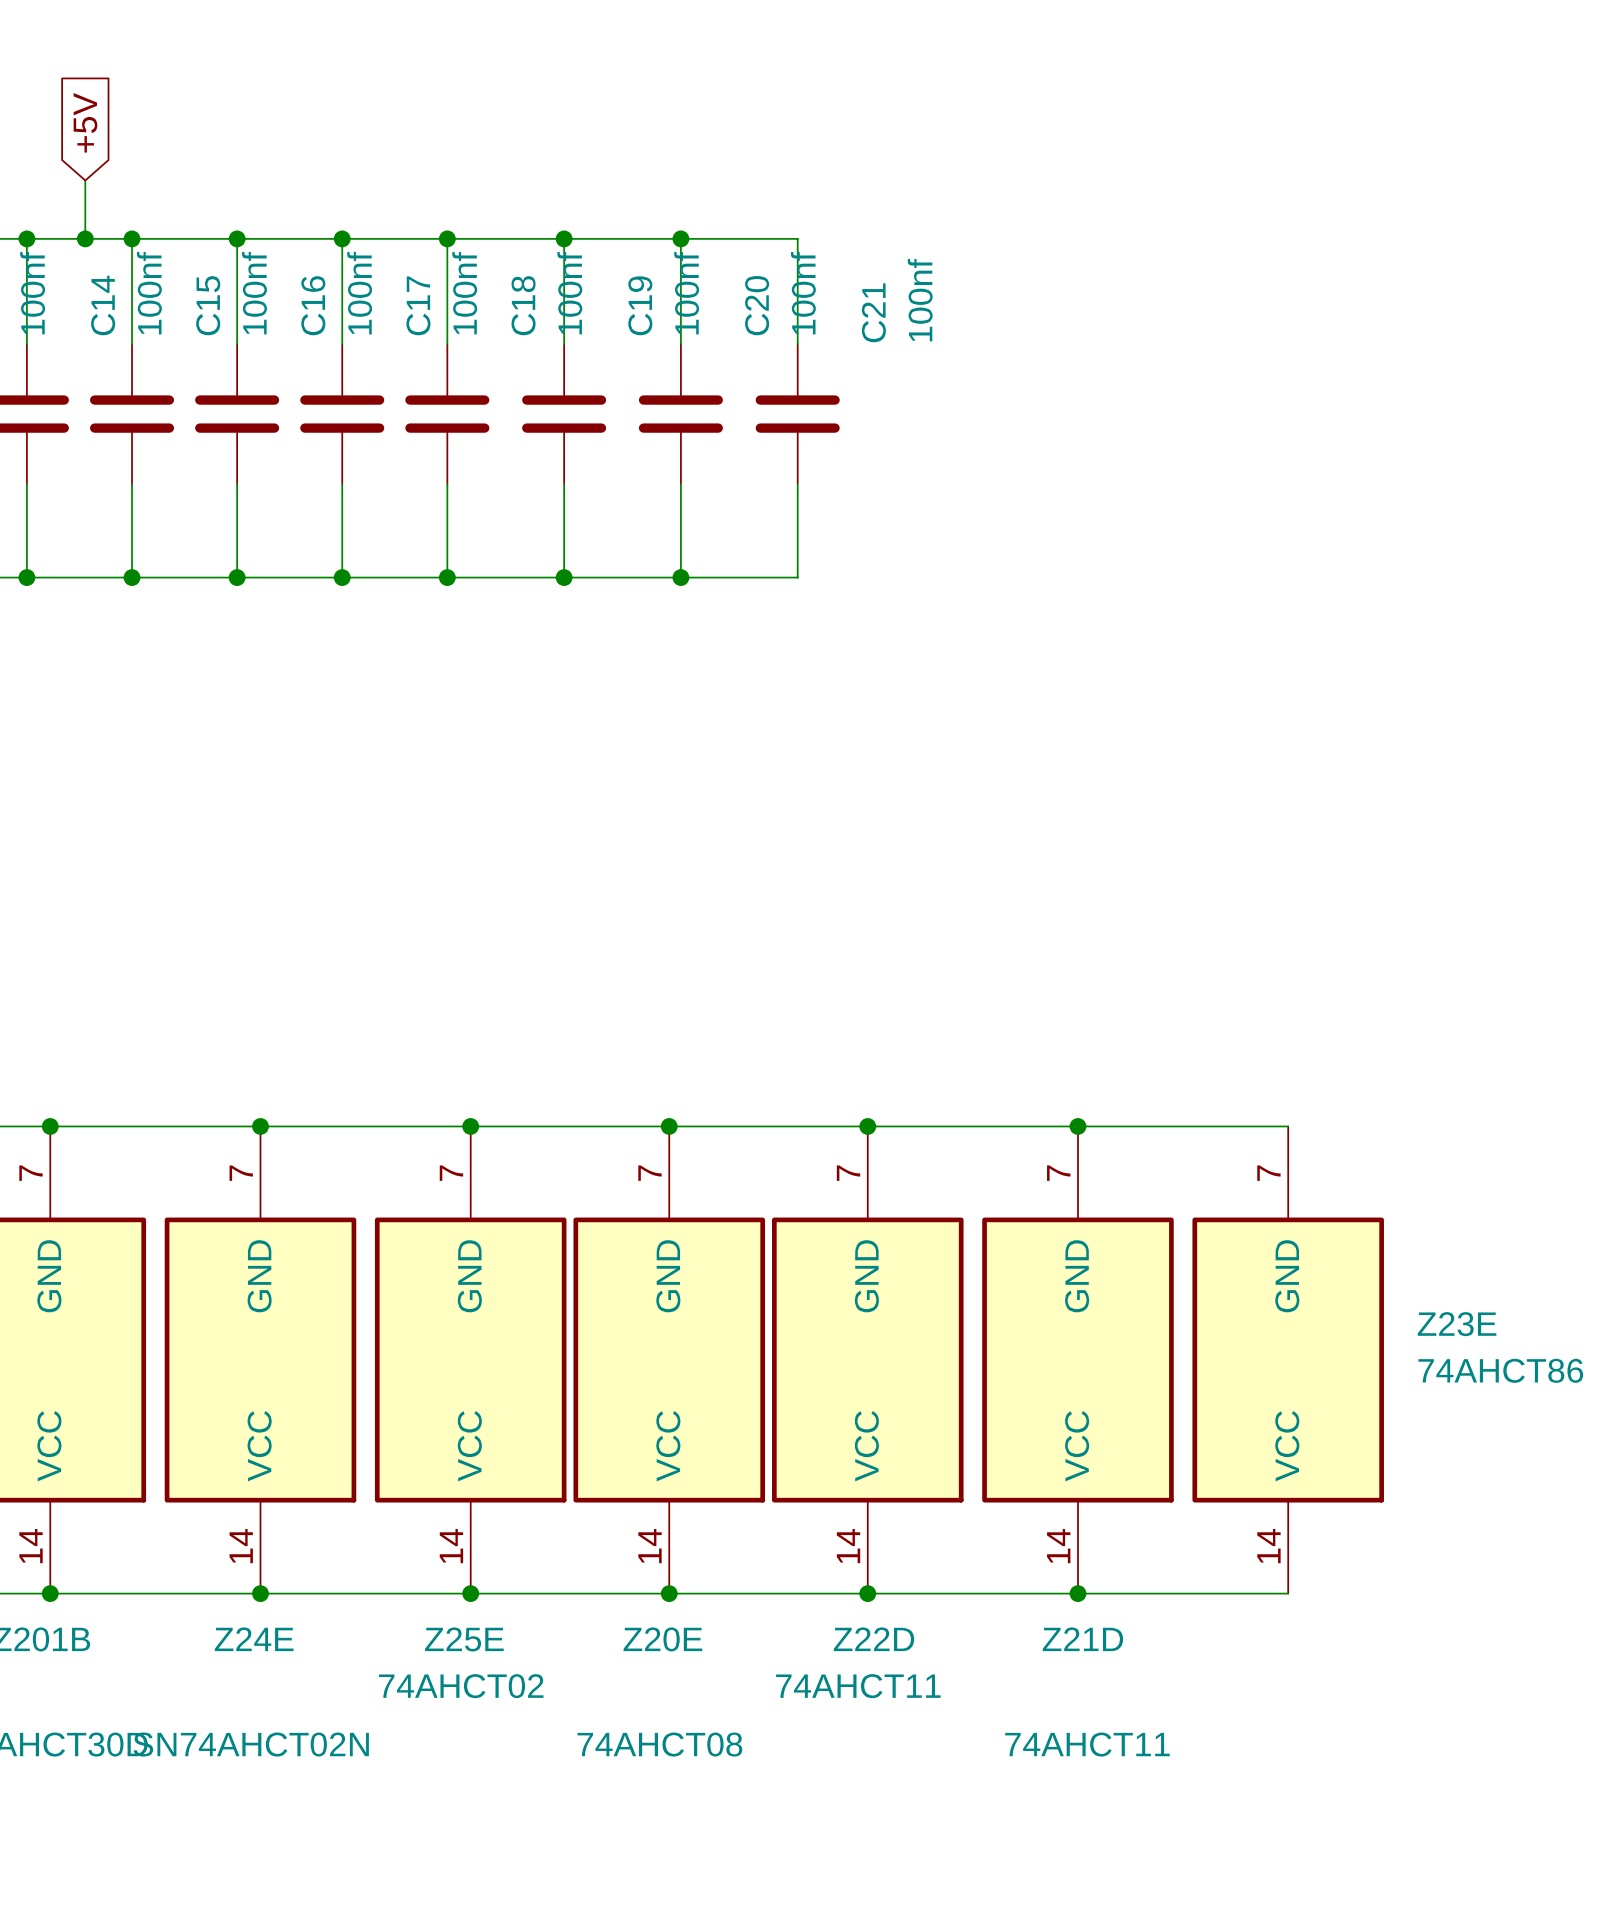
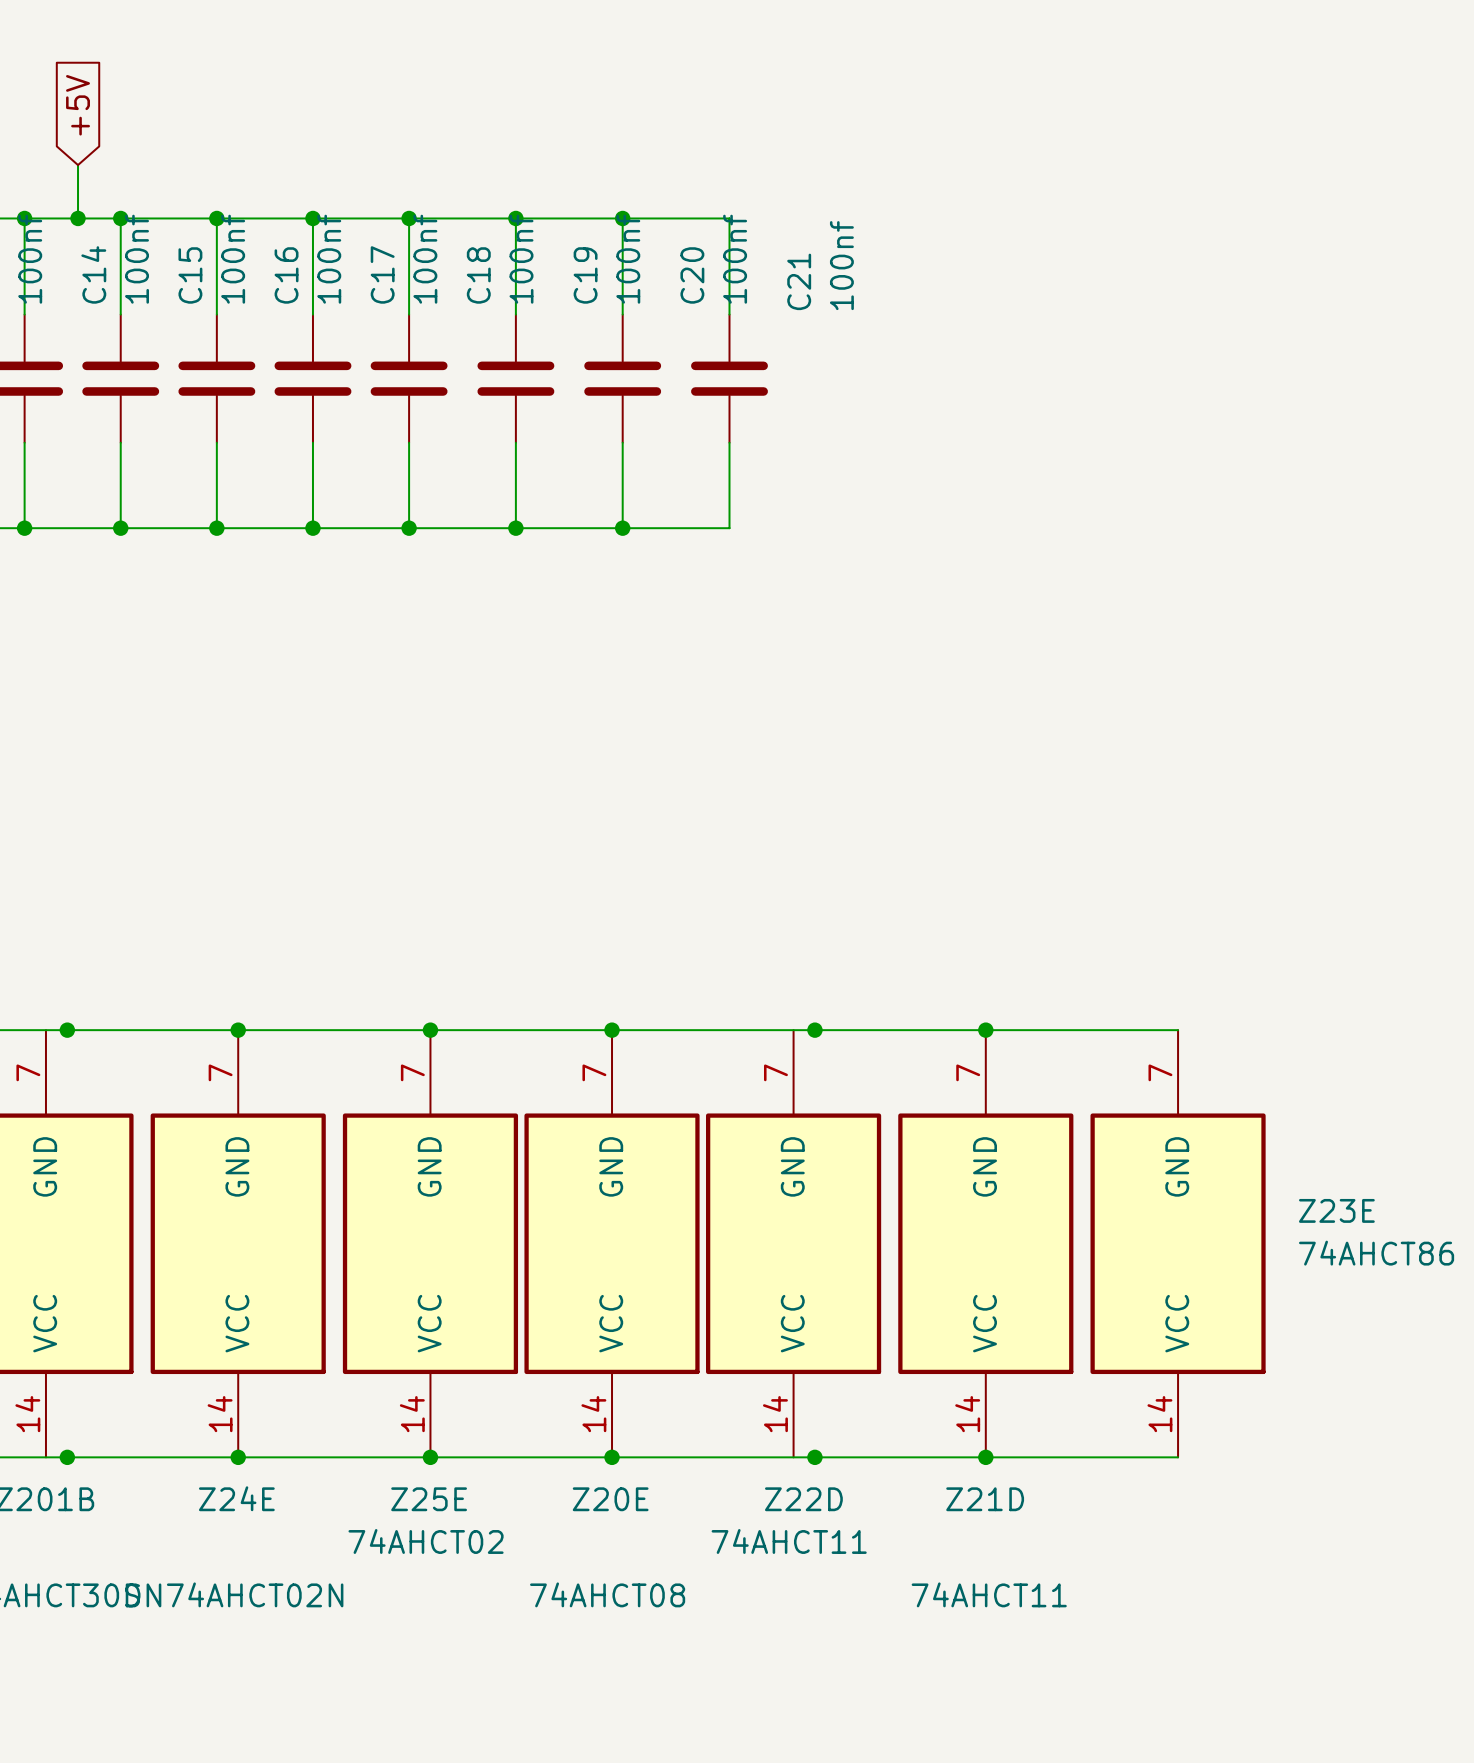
junction position: (50, 1126) -> (67, 1030)
junction position: (867, 1126) -> (814, 1030)
junction position: (50, 1593) -> (67, 1457)
junction position: (867, 1593) -> (814, 1457)

